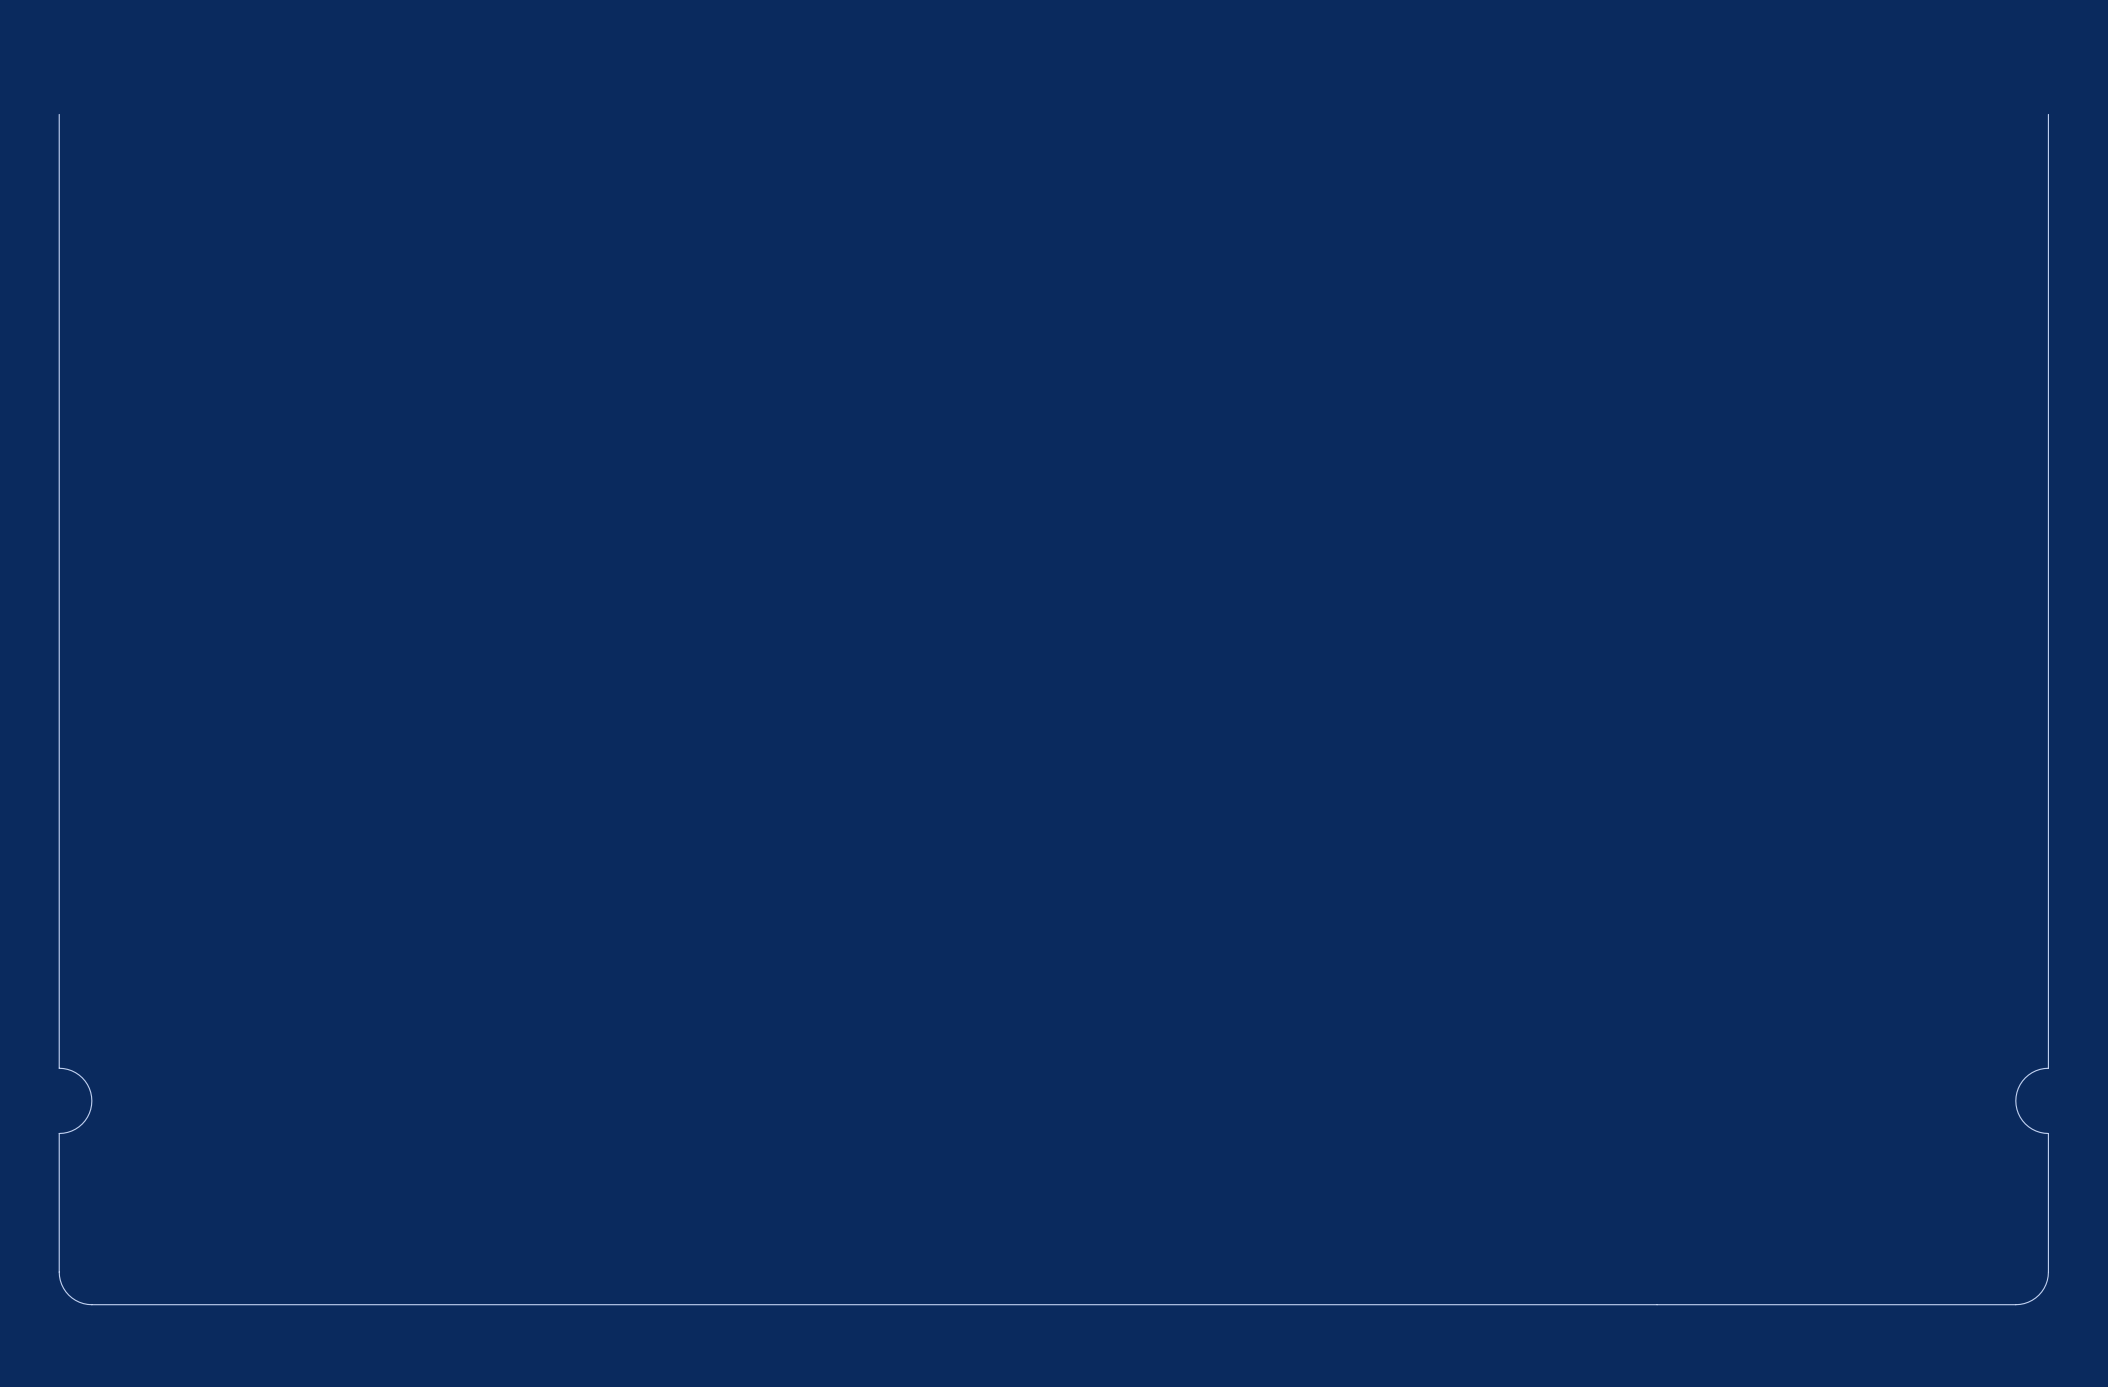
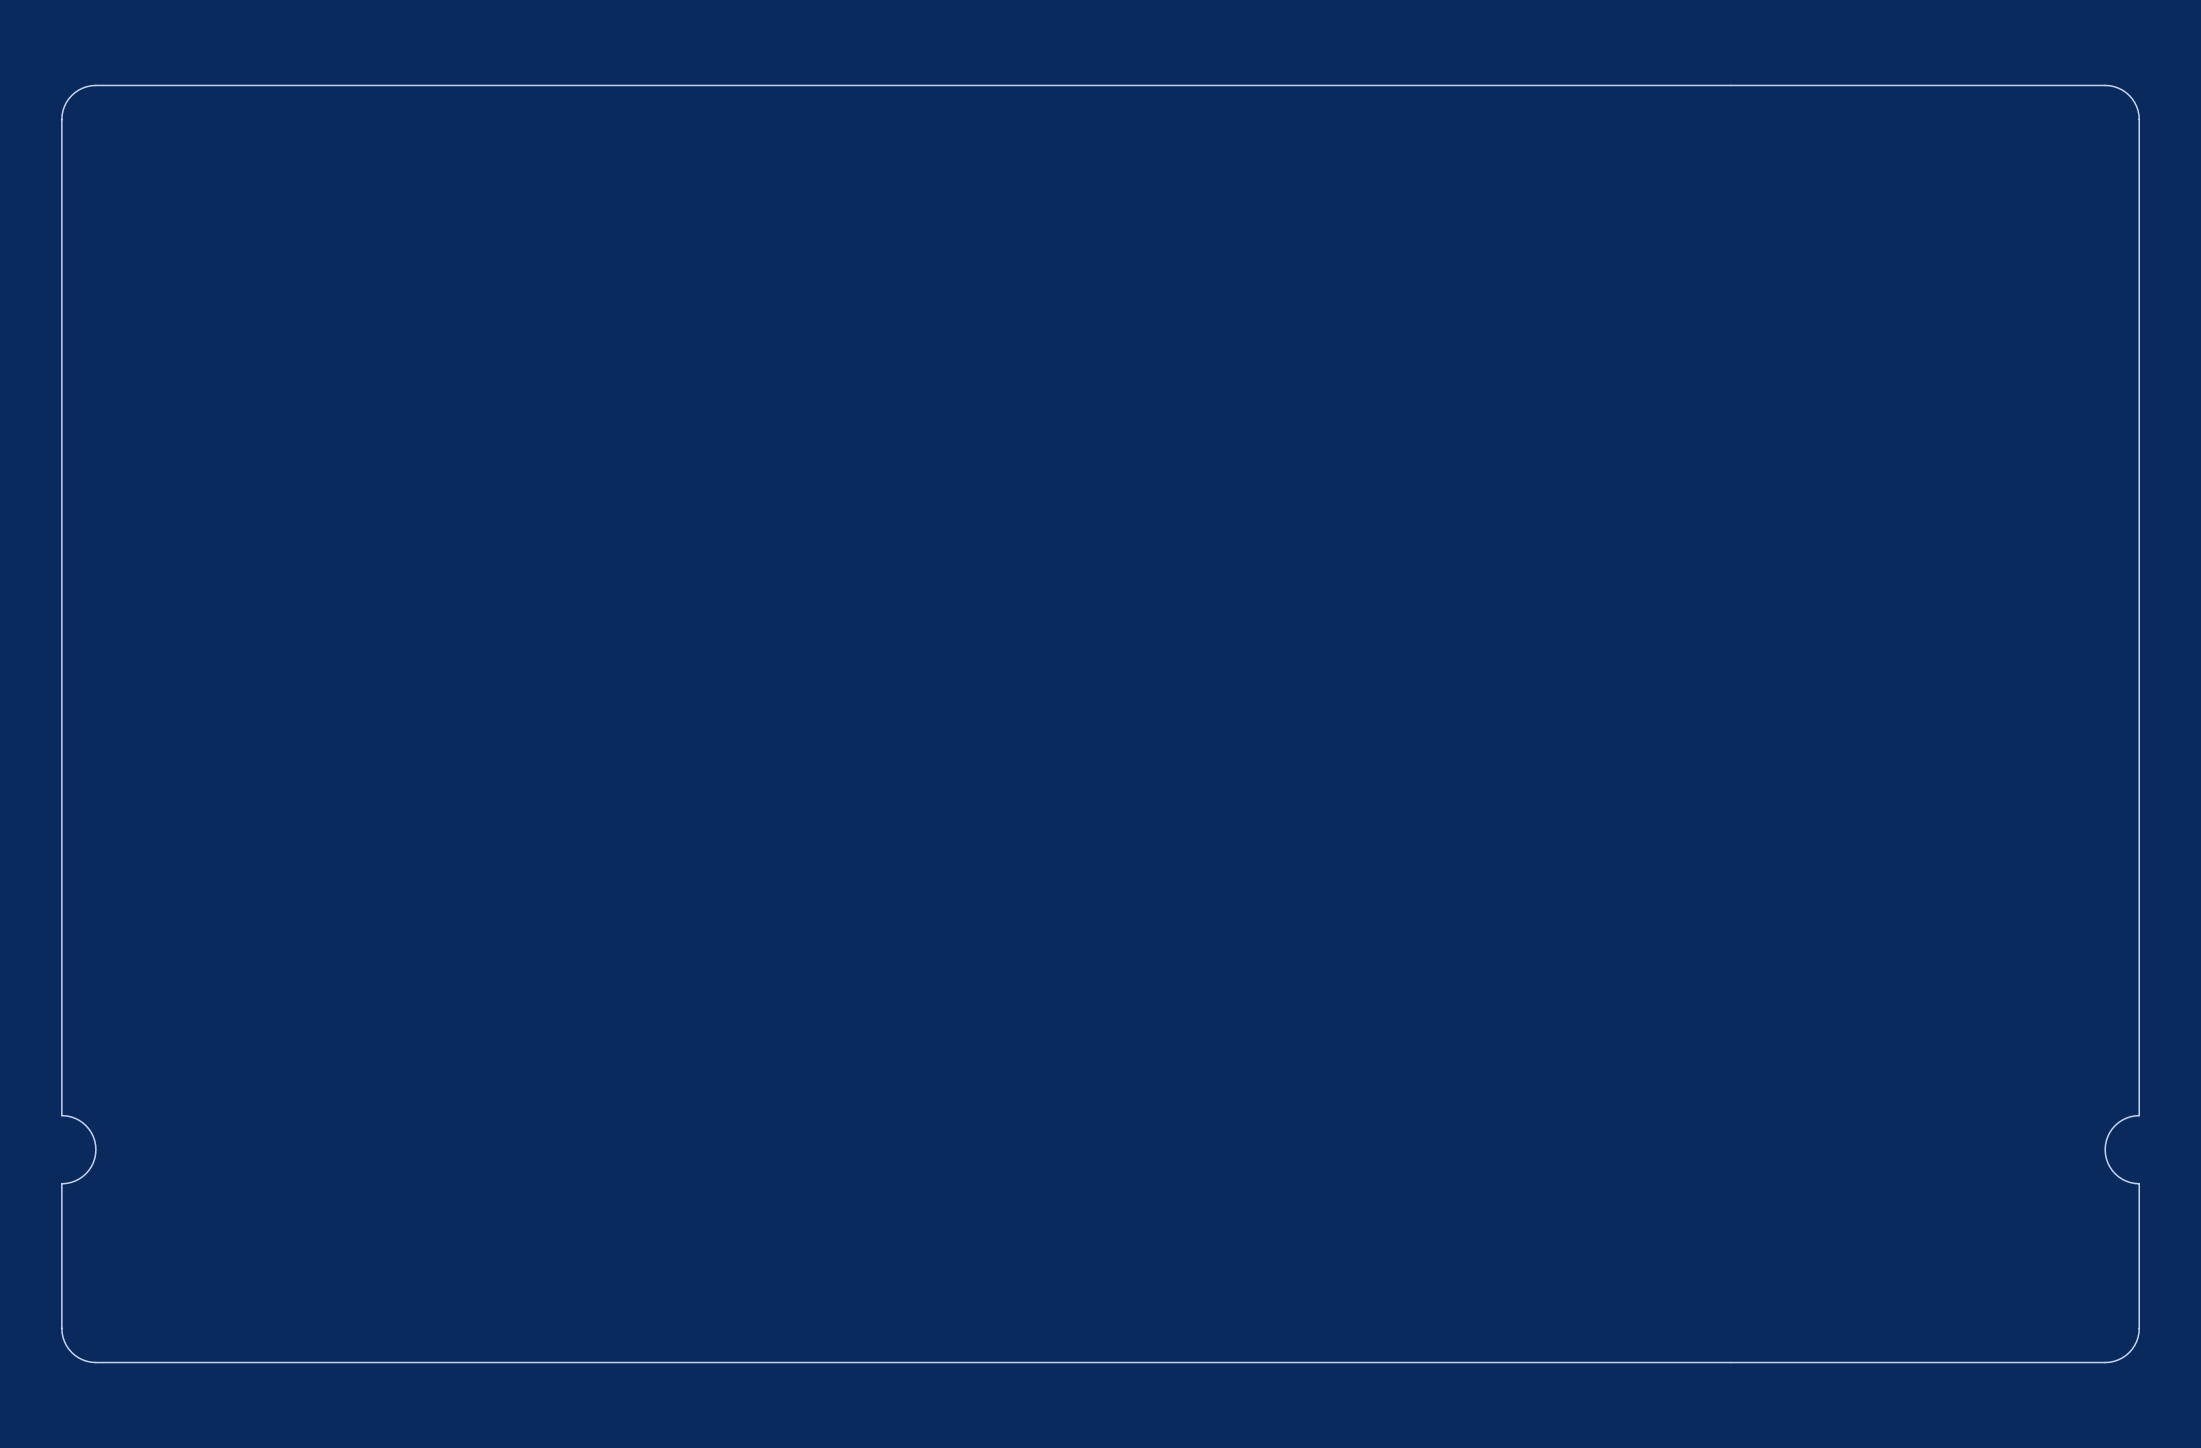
board edge: none -> (2139, 119) (2136, 106) (2129, 95) (2118, 88) (2105, 85) (95, 85) (82, 88) (71, 95) (64, 106) (61, 119)

